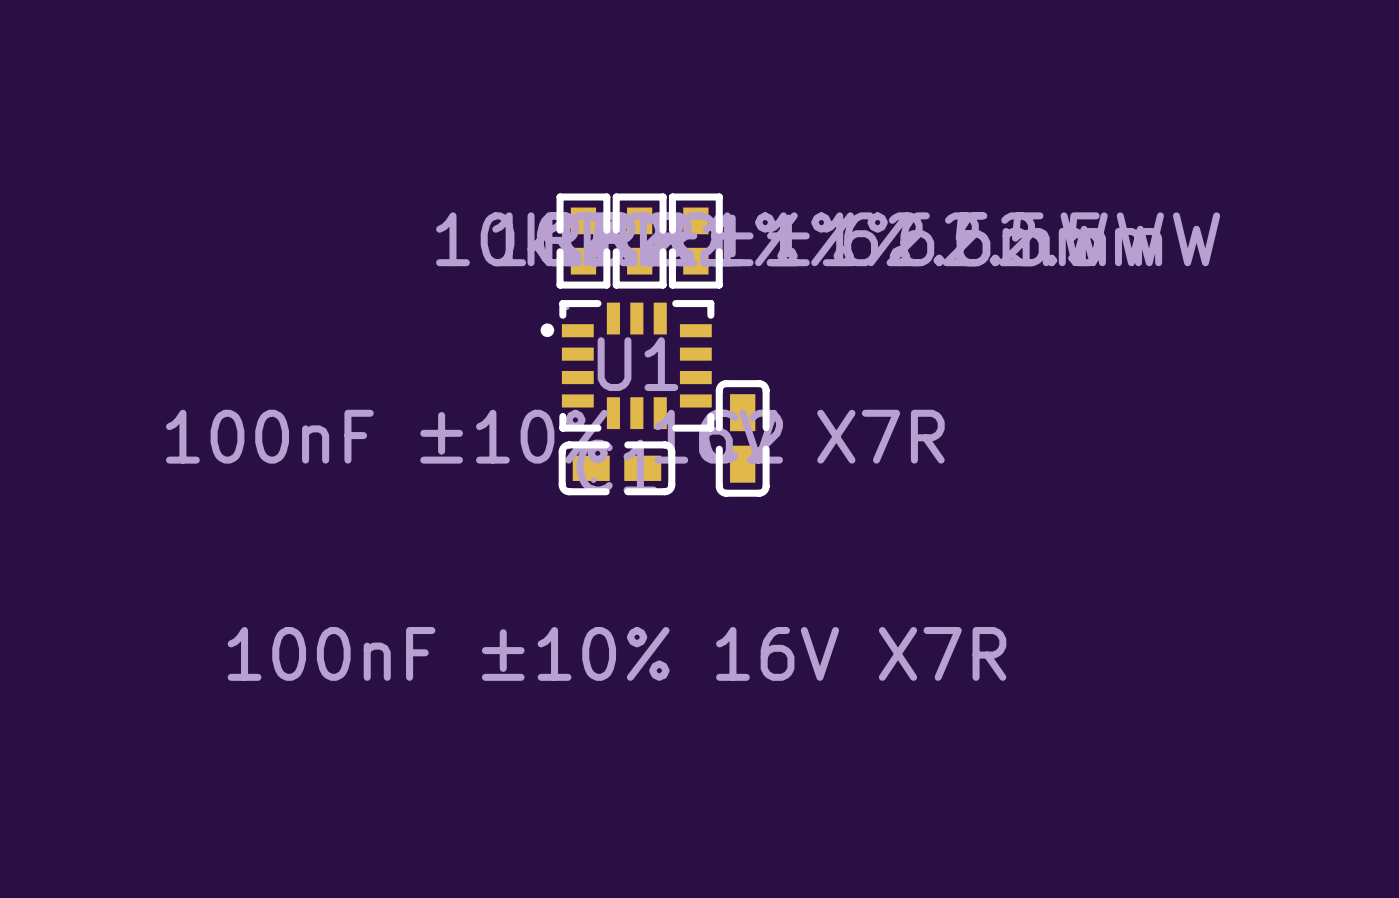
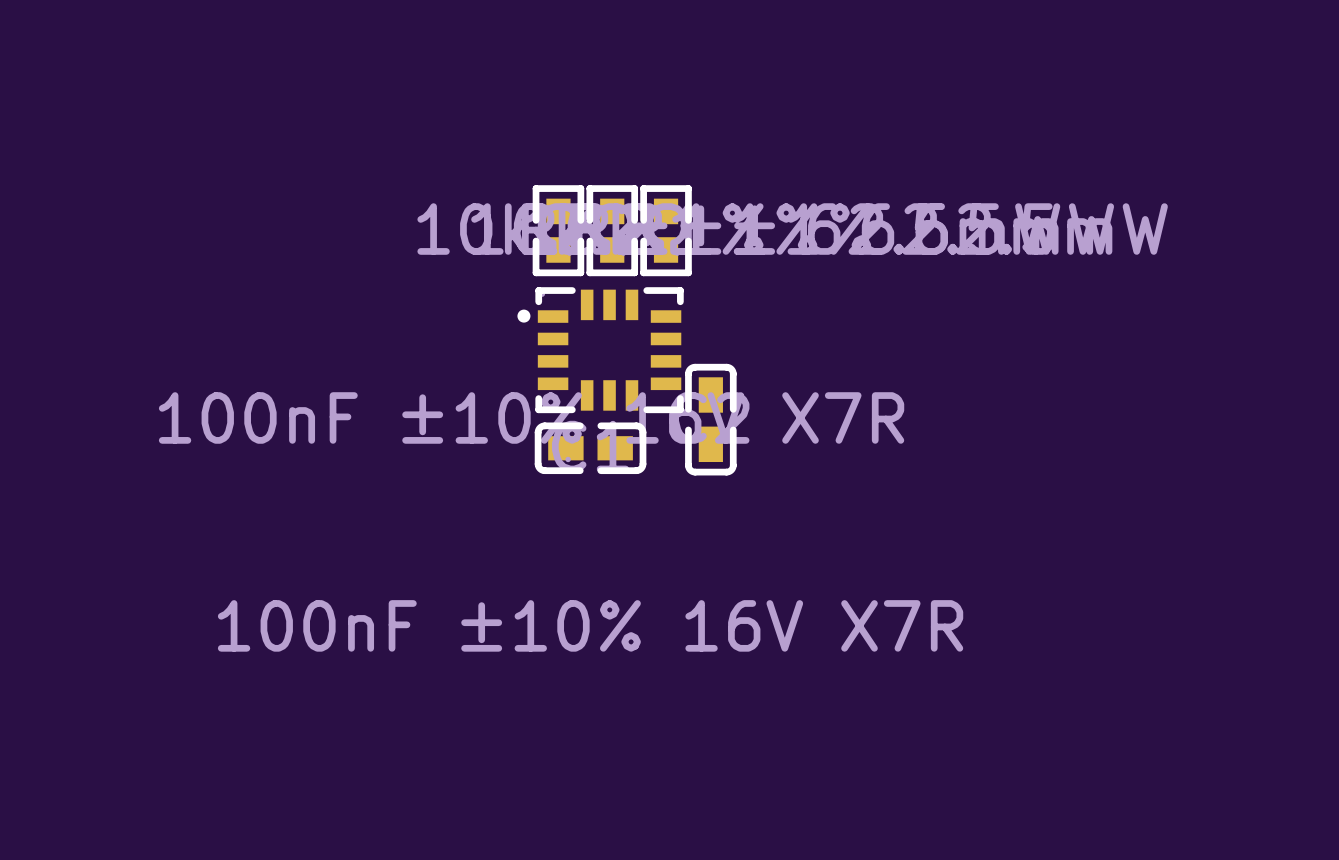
U1 name: U1 (637, 364) -> none

